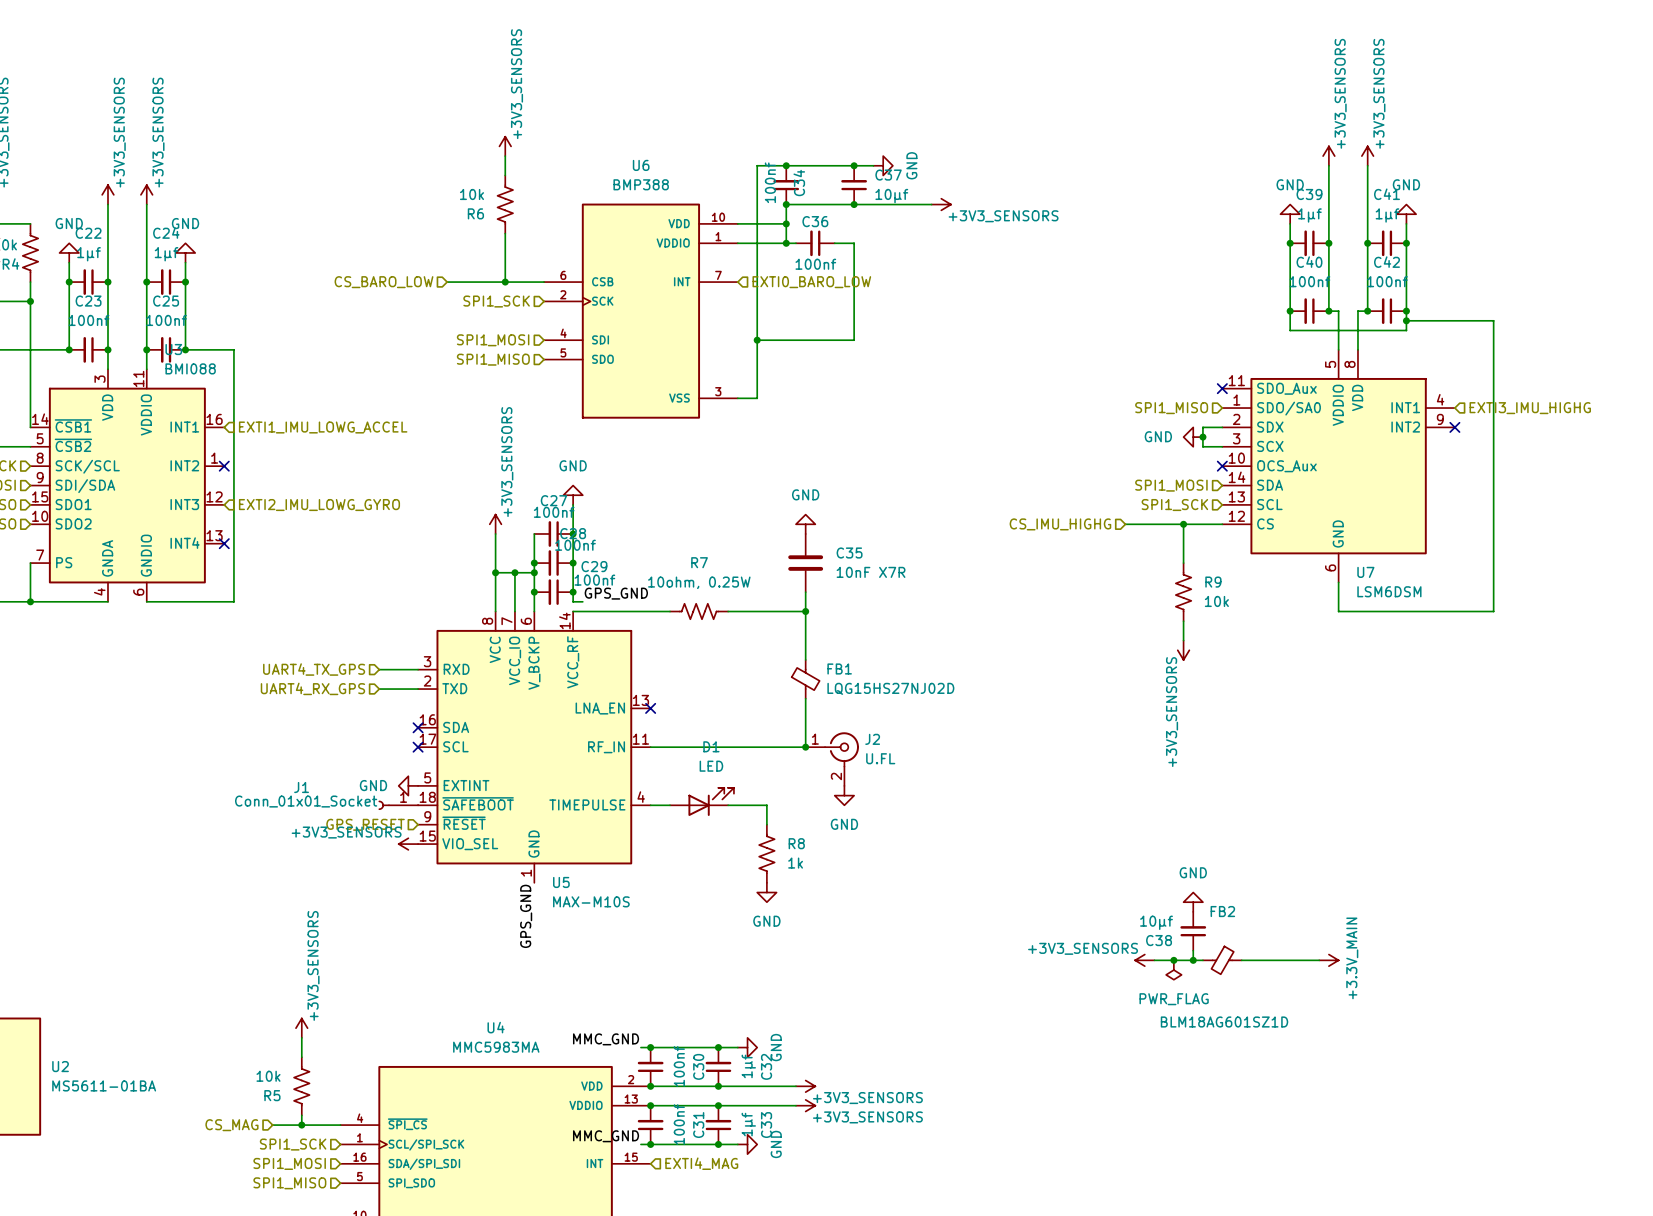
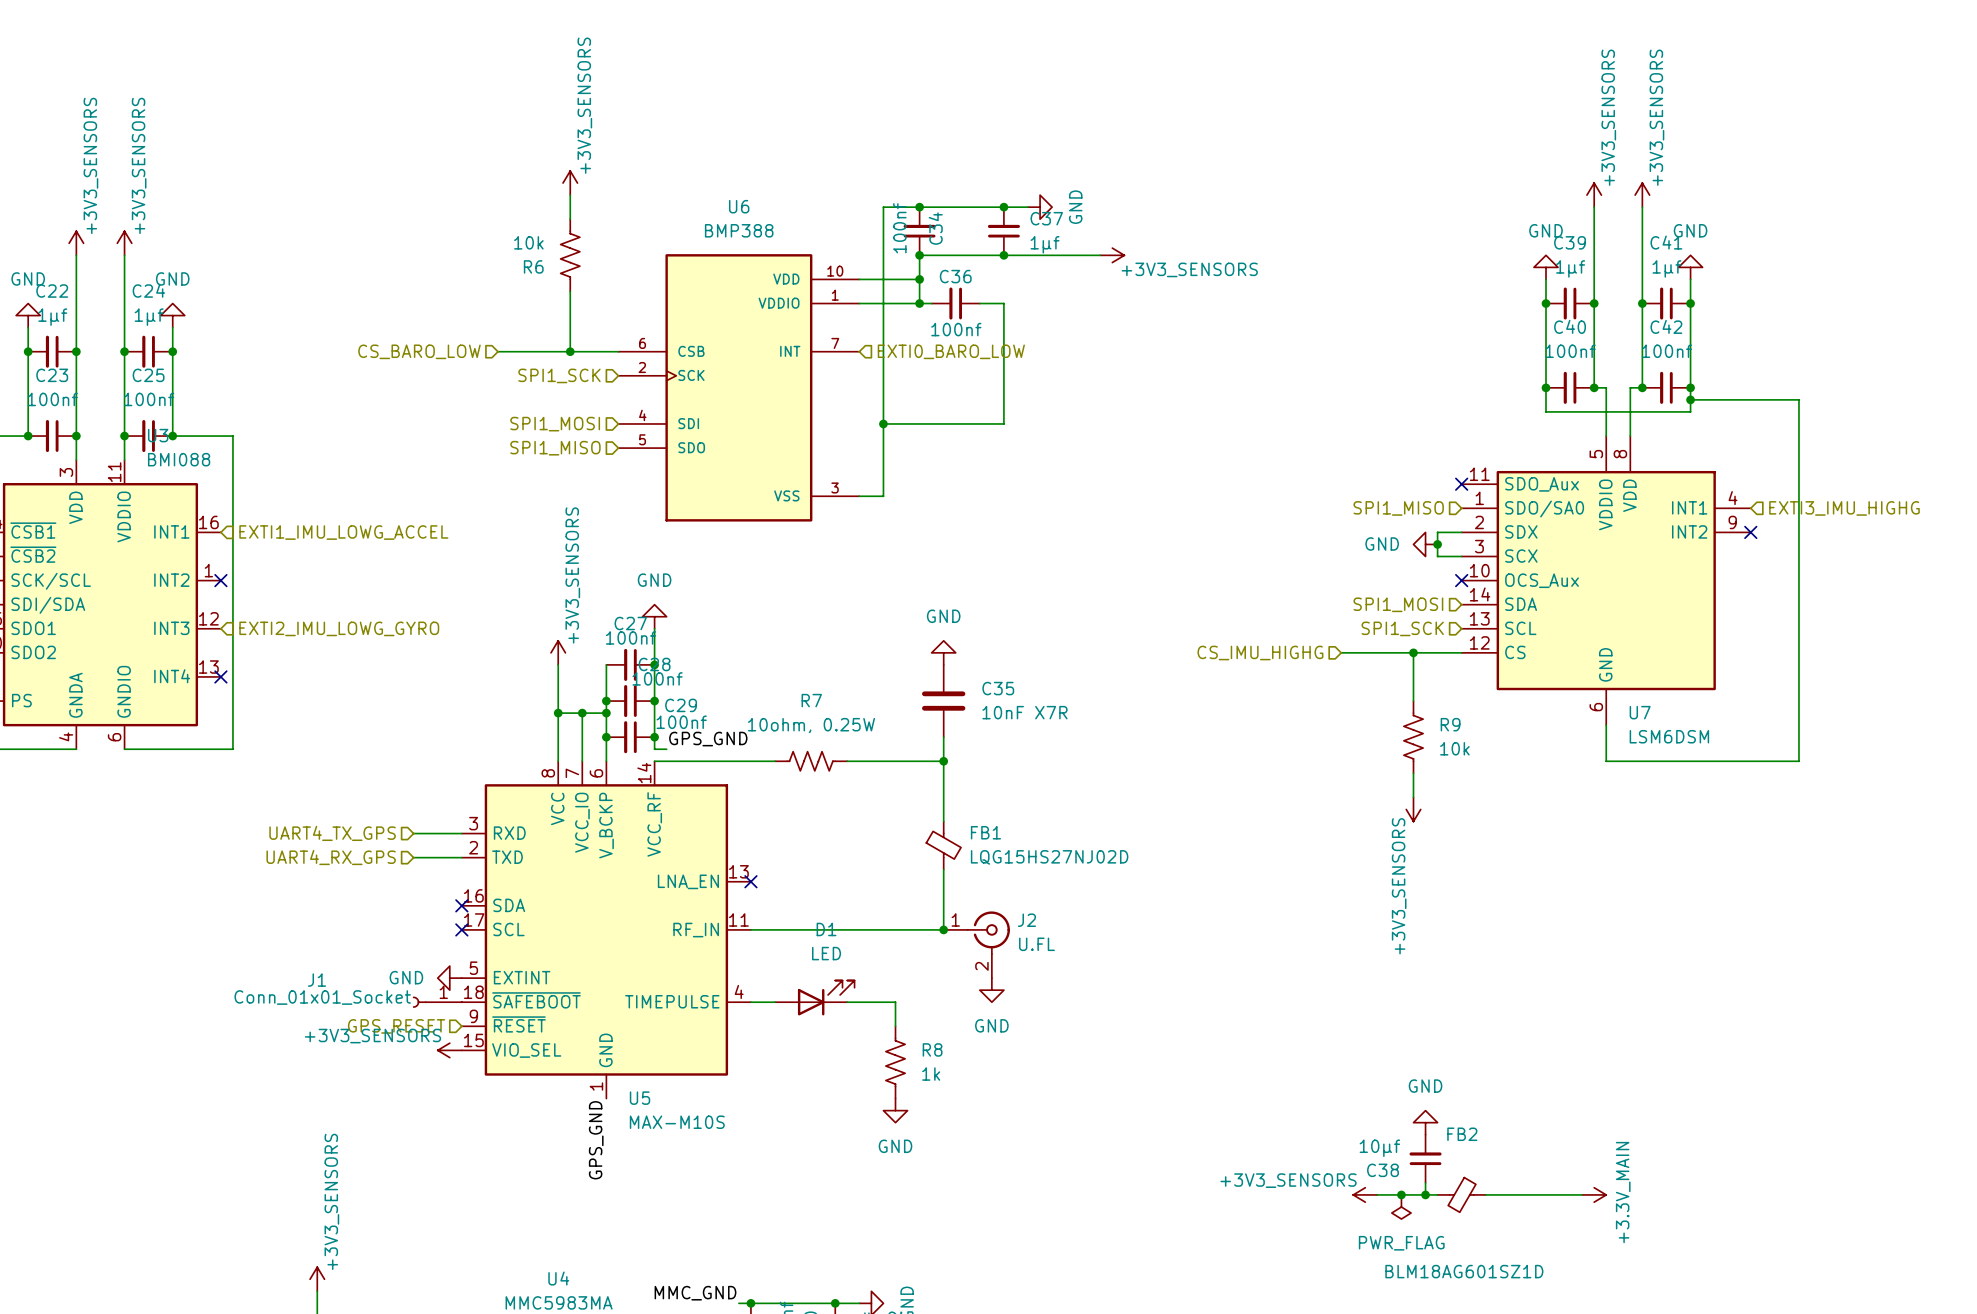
C37 value: 10μf (891, 196) -> 1μf (1045, 244)

